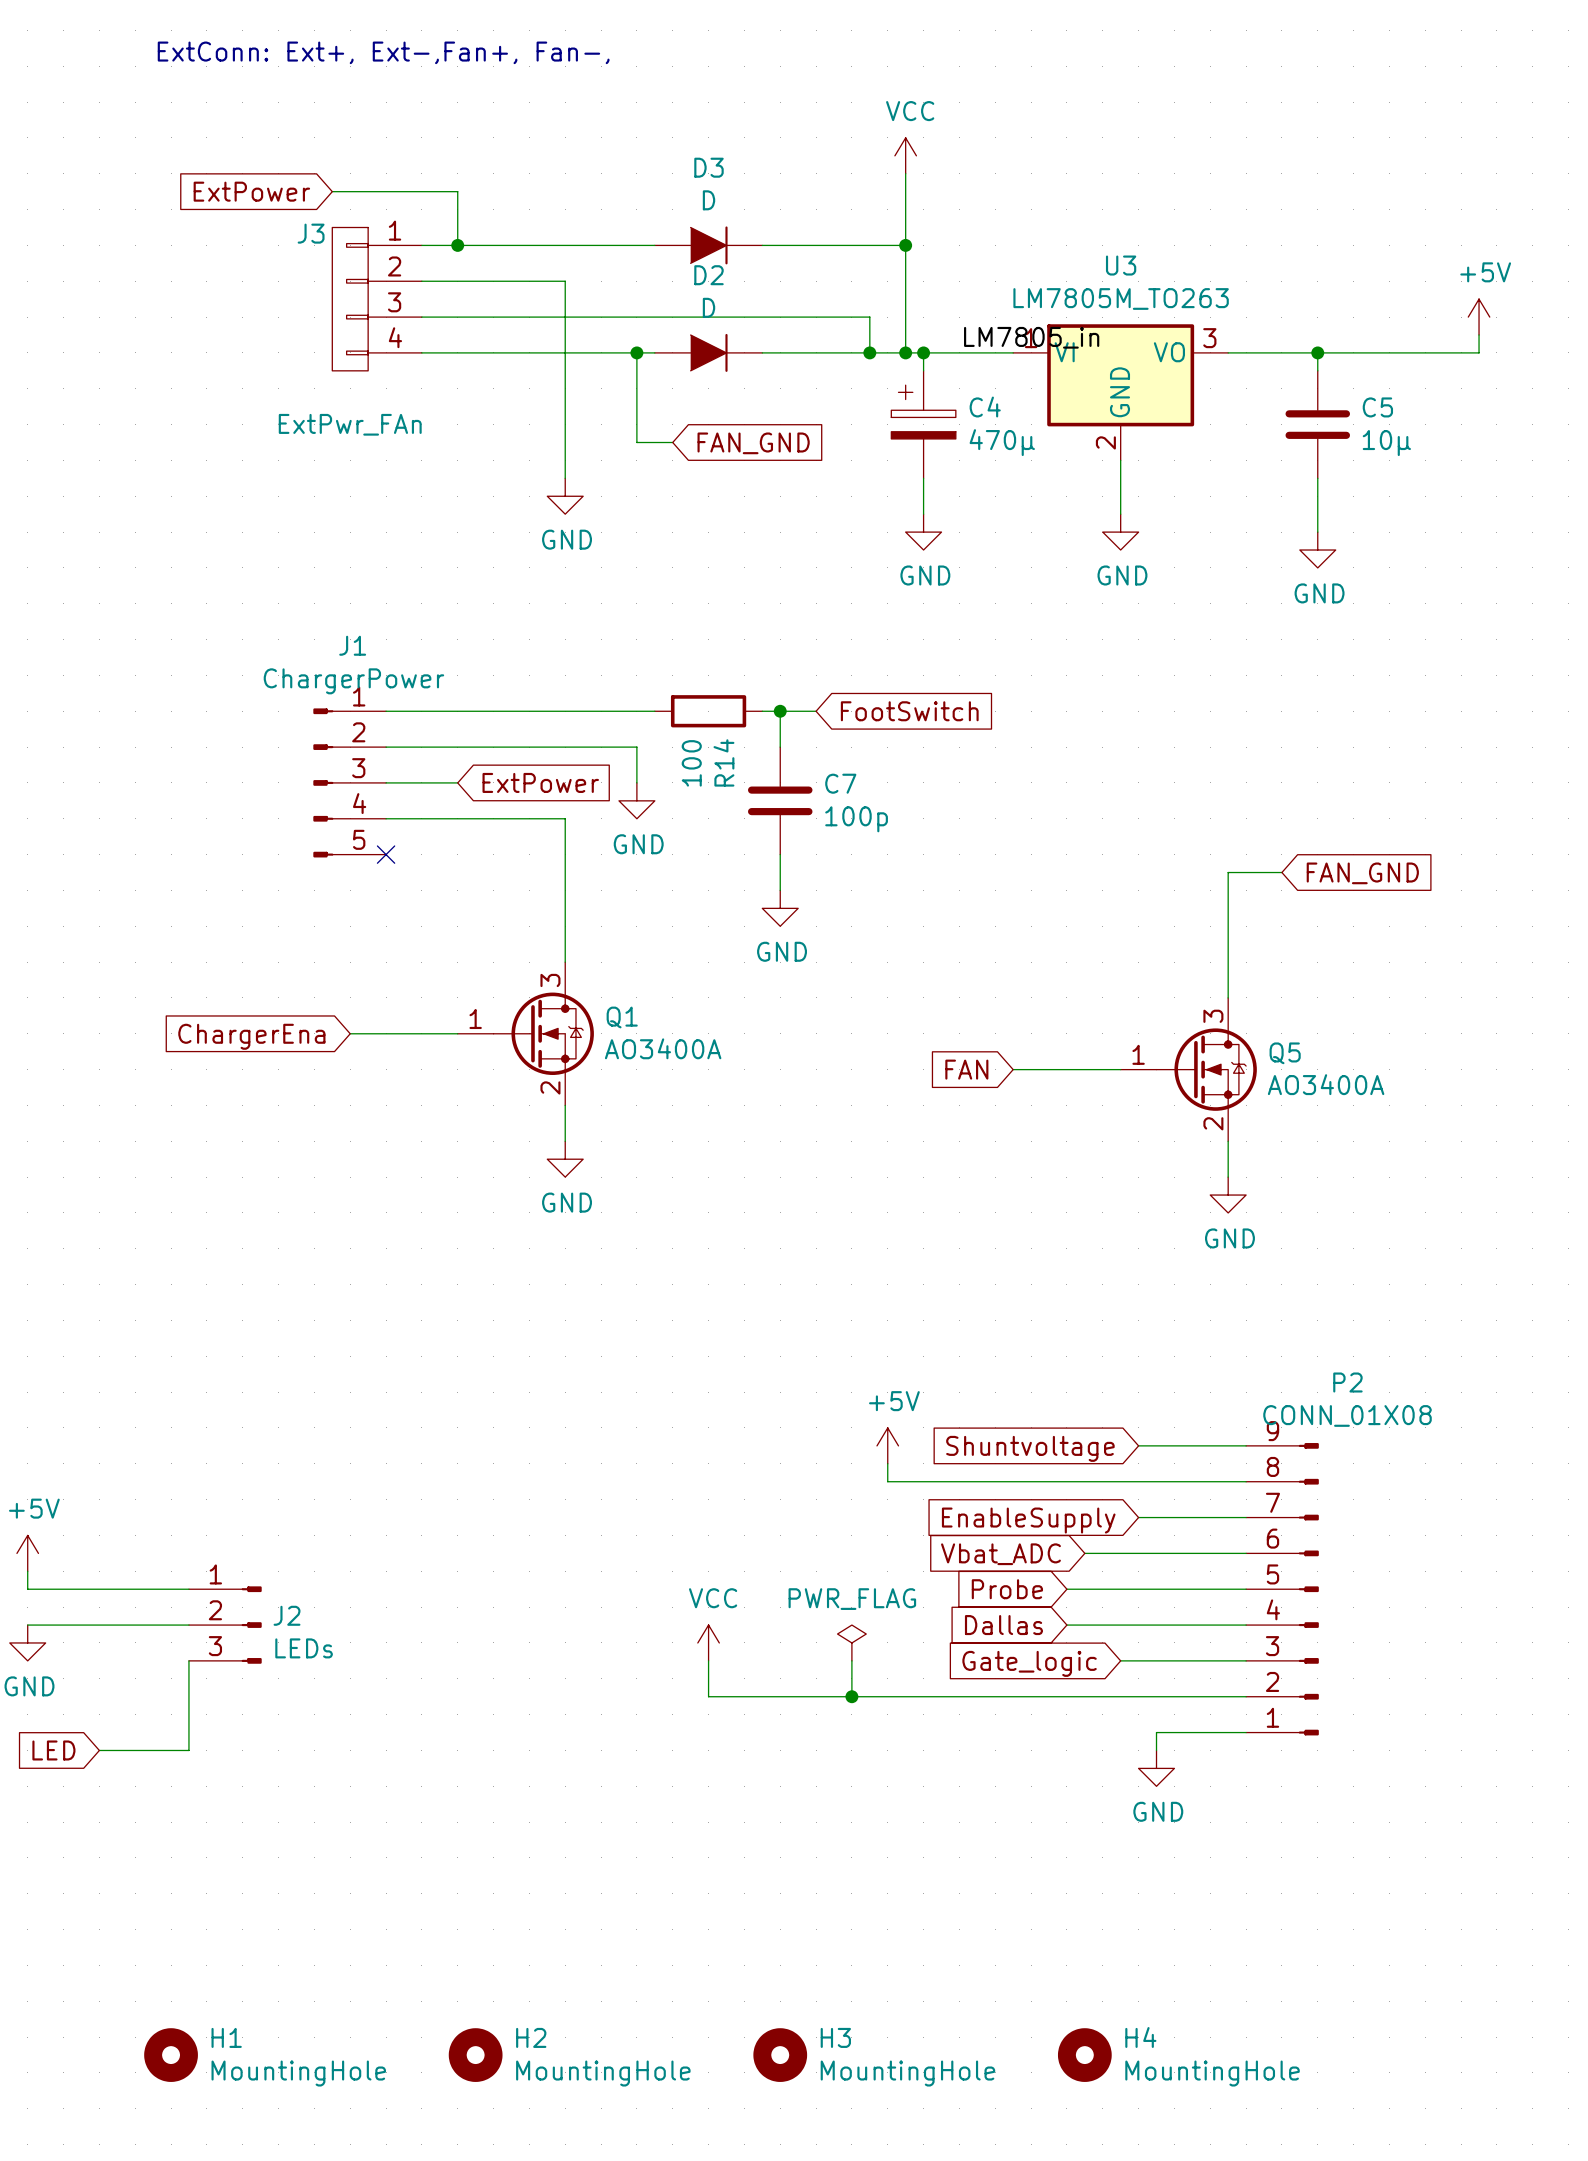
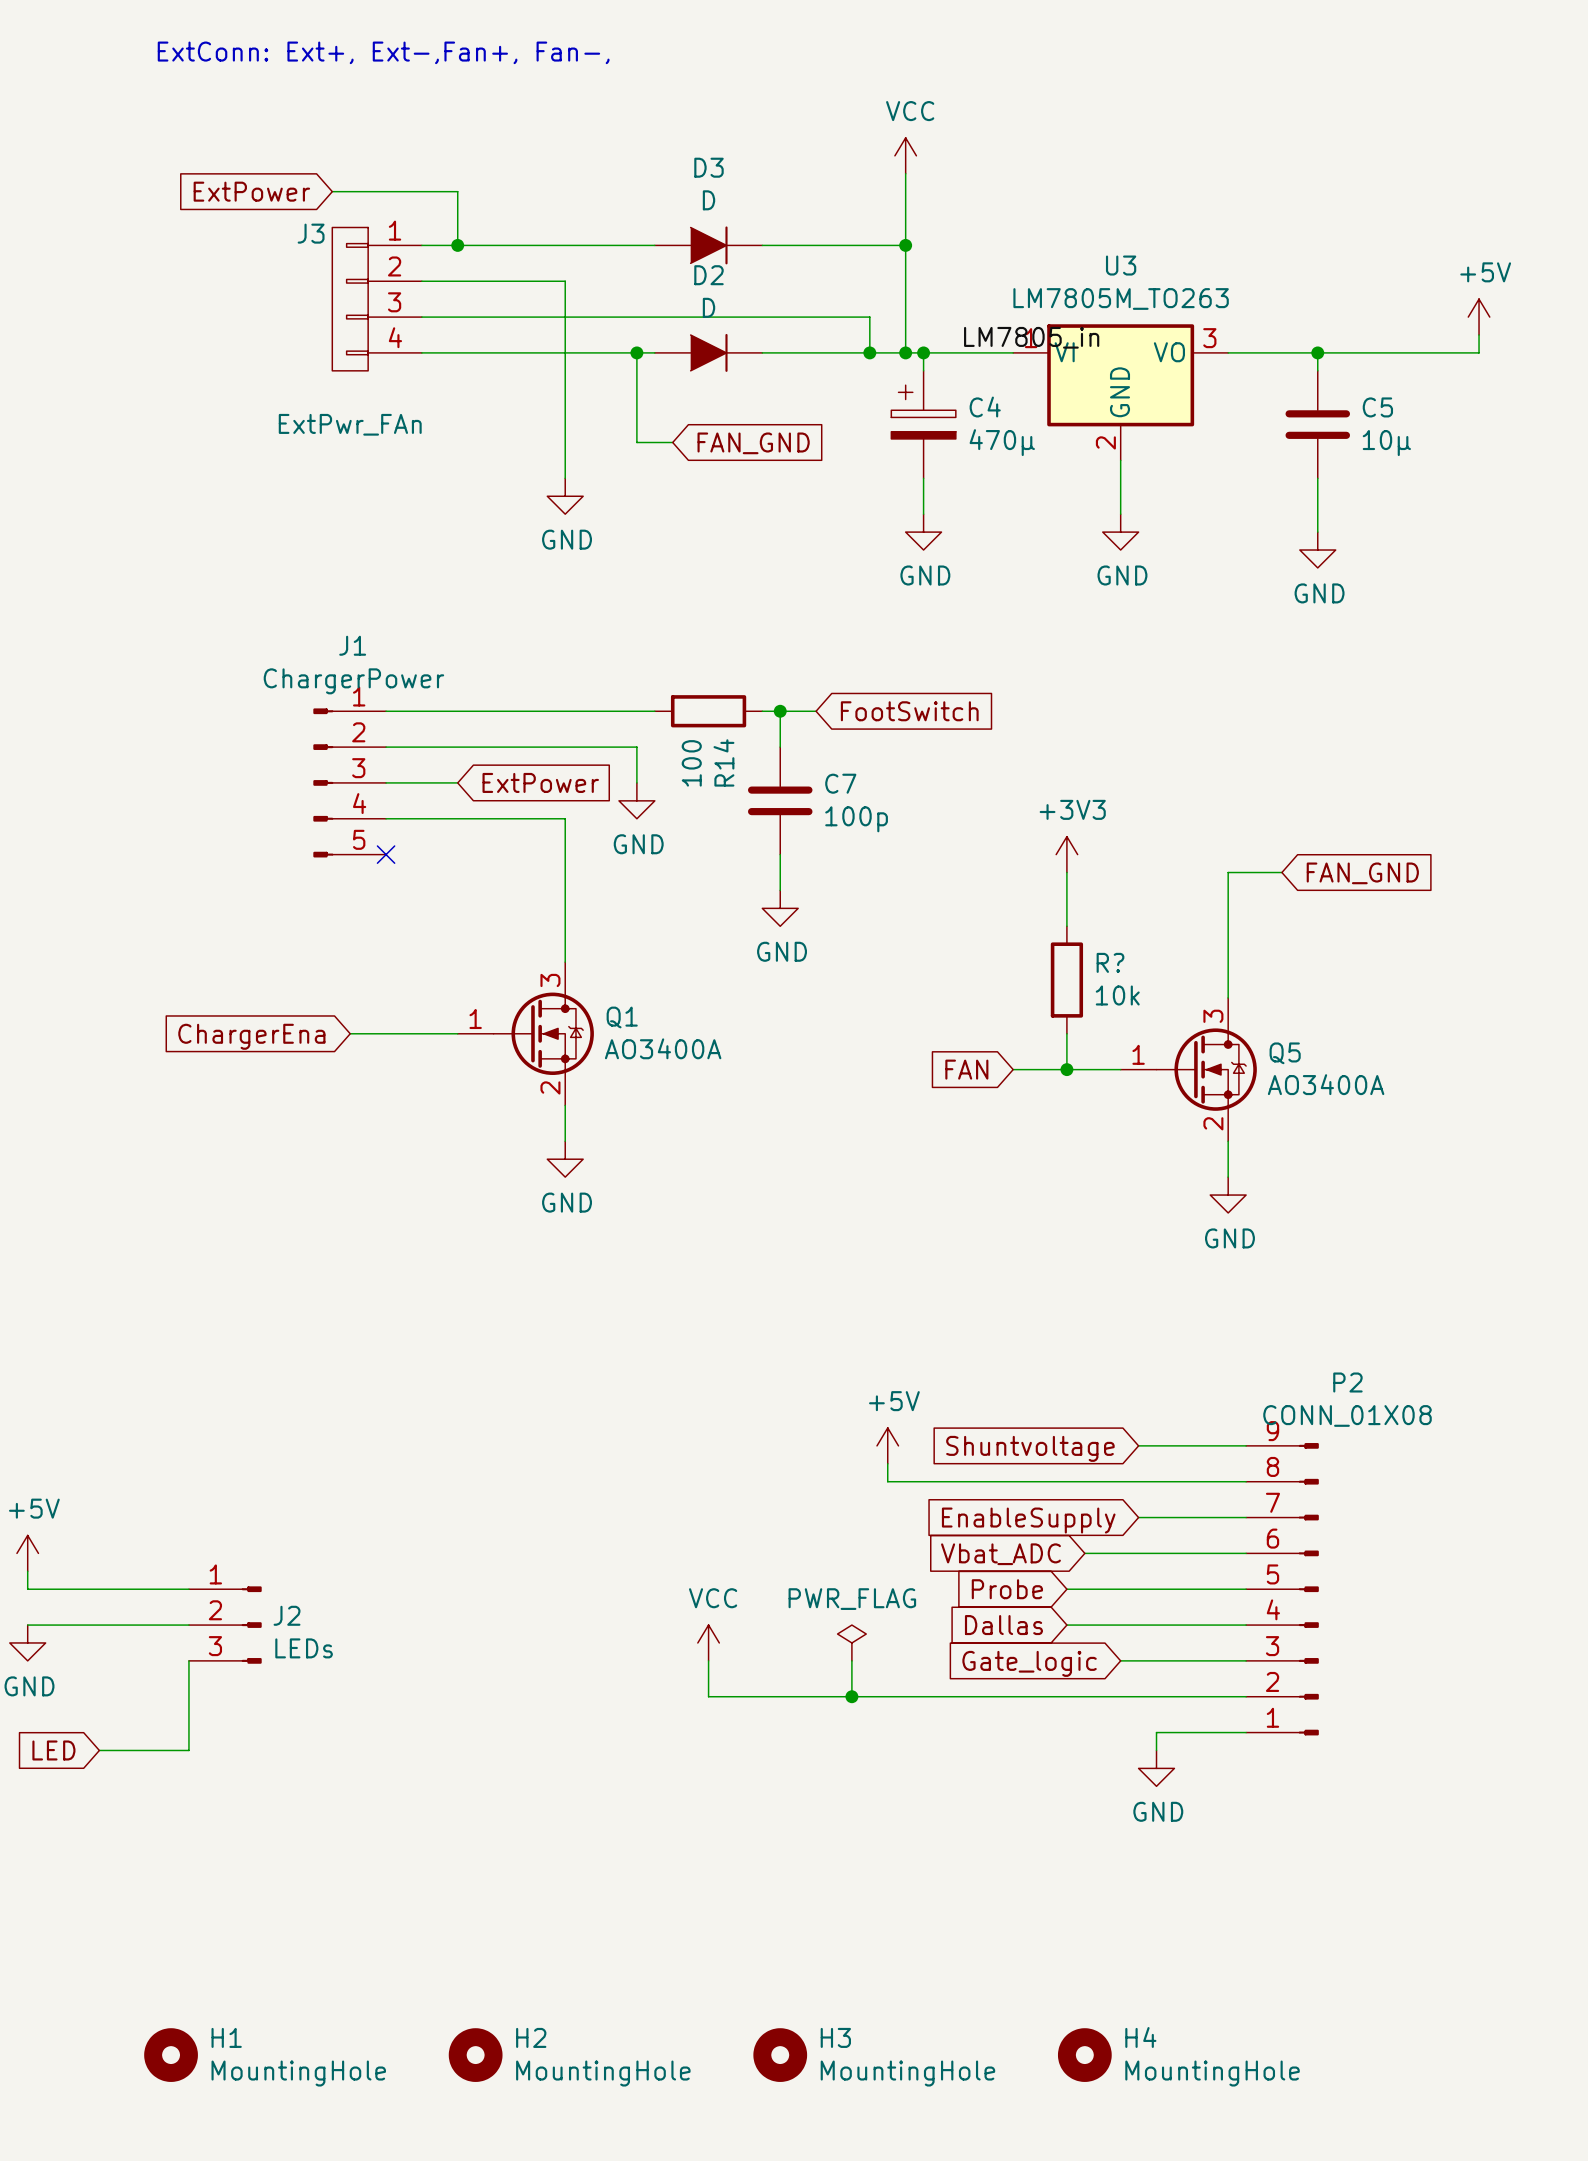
power symbol: none -> +3V3 (1066, 854)
wire: none -> (1066, 872) (1066, 926)
R?: none -> 10k (1066, 980)
wire: none -> (1066, 1033) (1066, 1069)
junction: none -> (1066, 1069)

